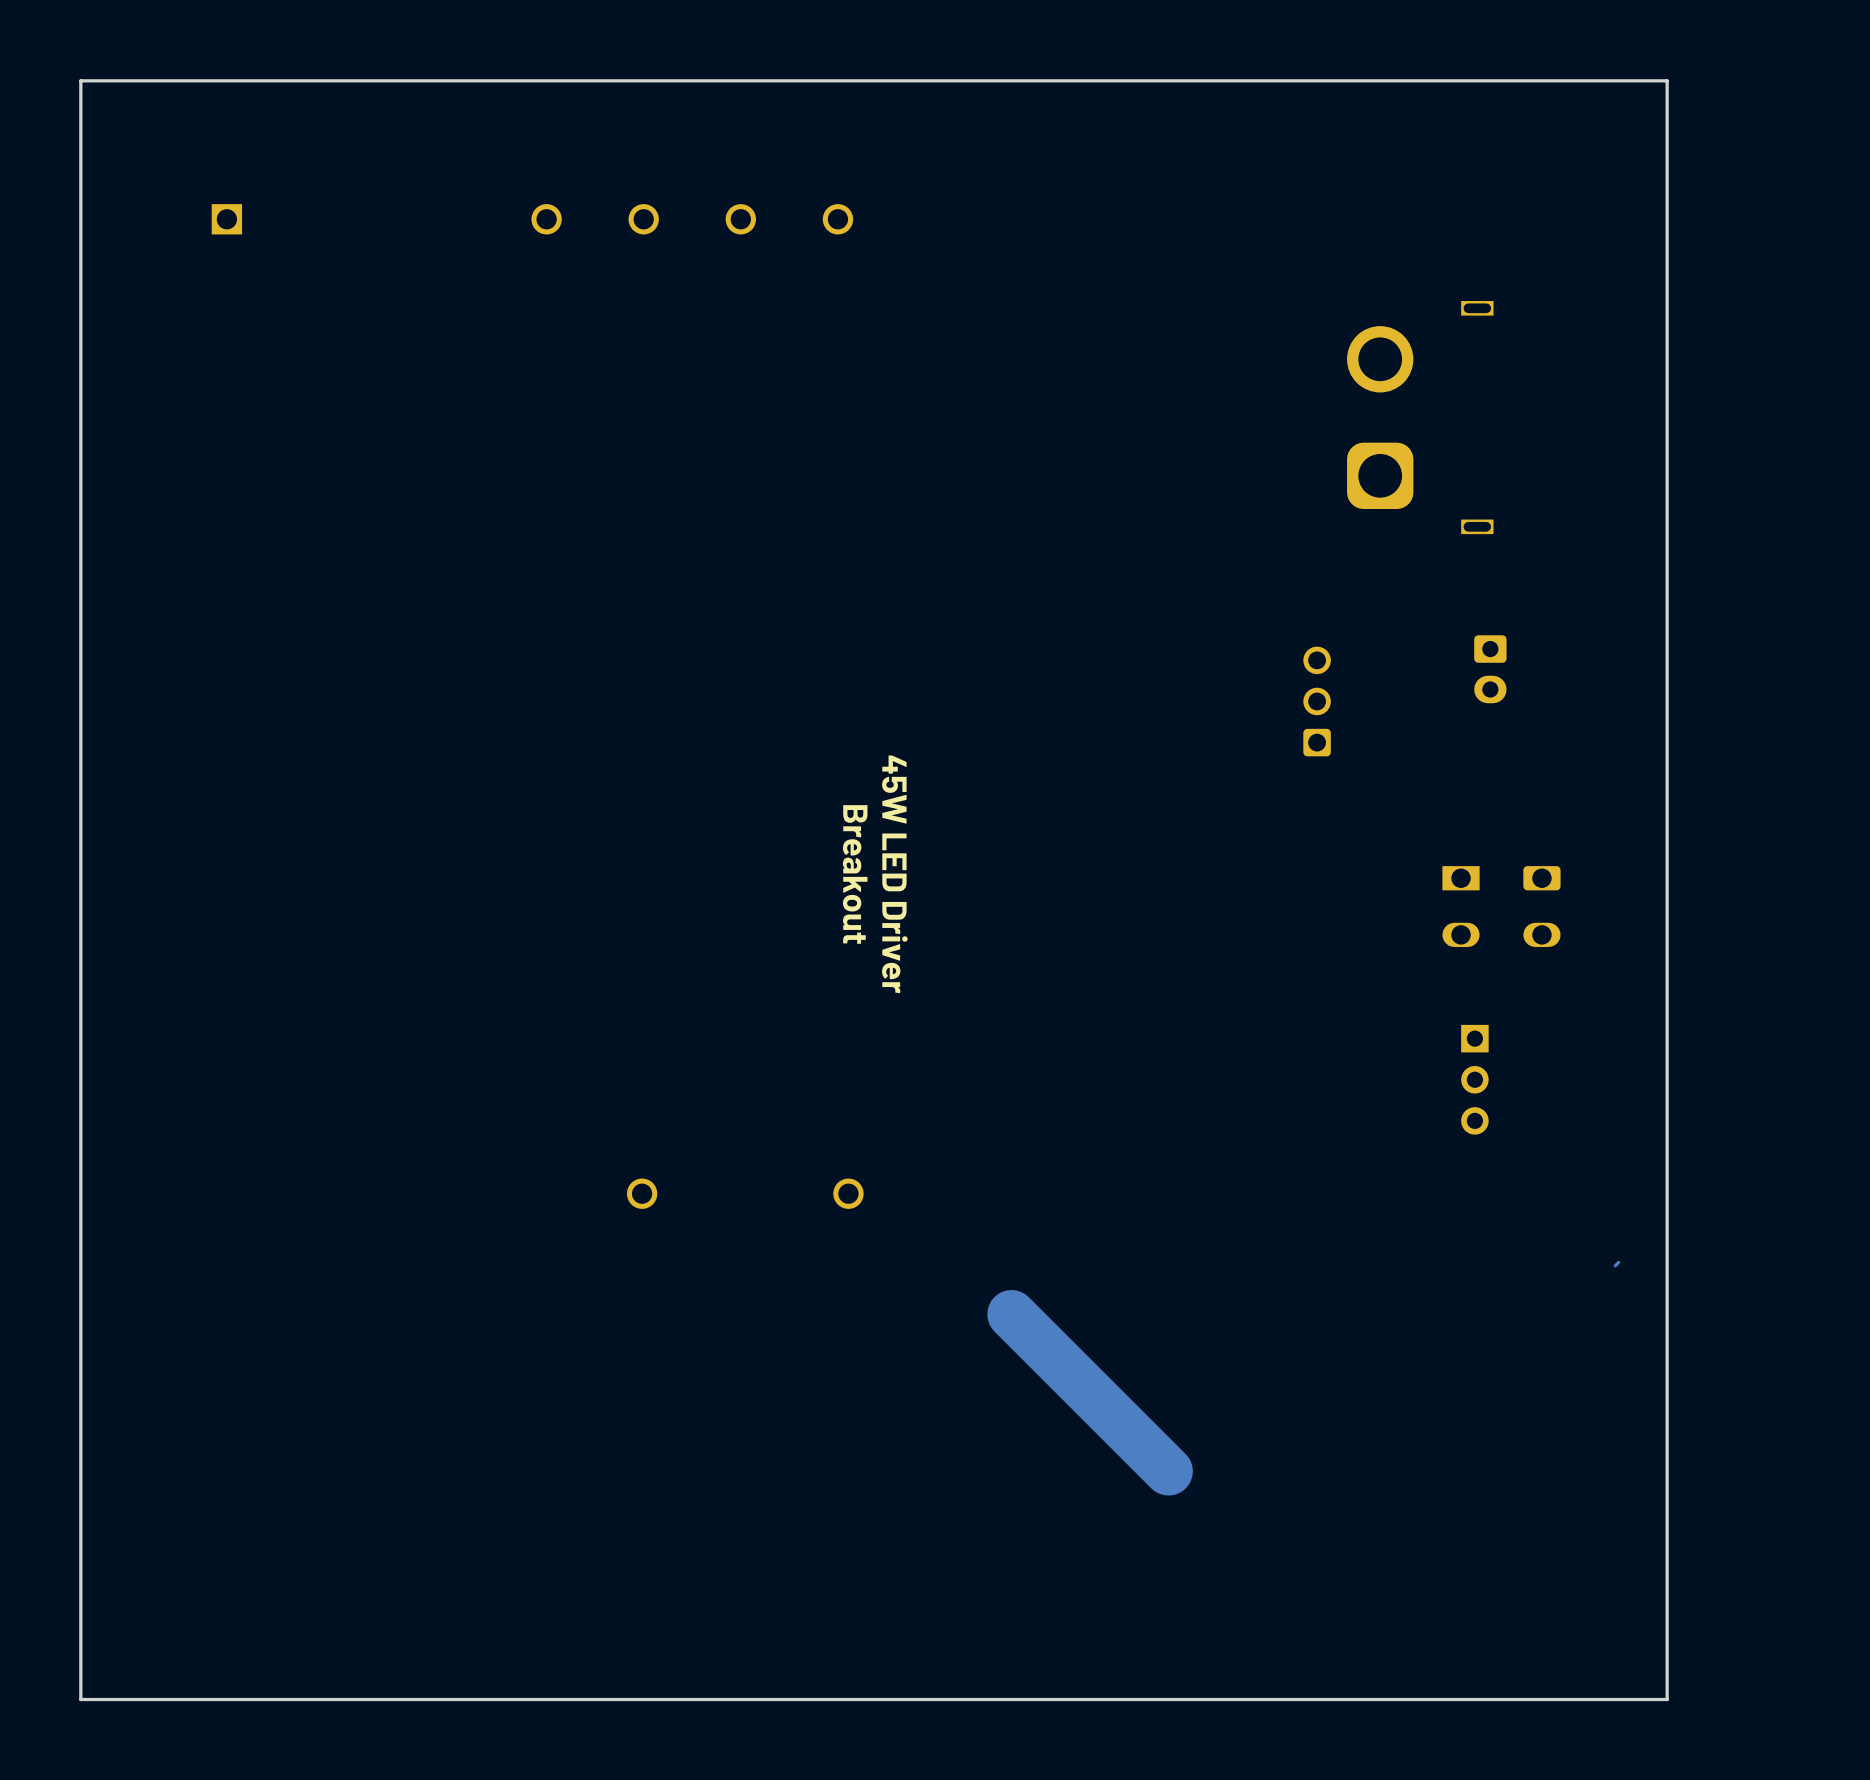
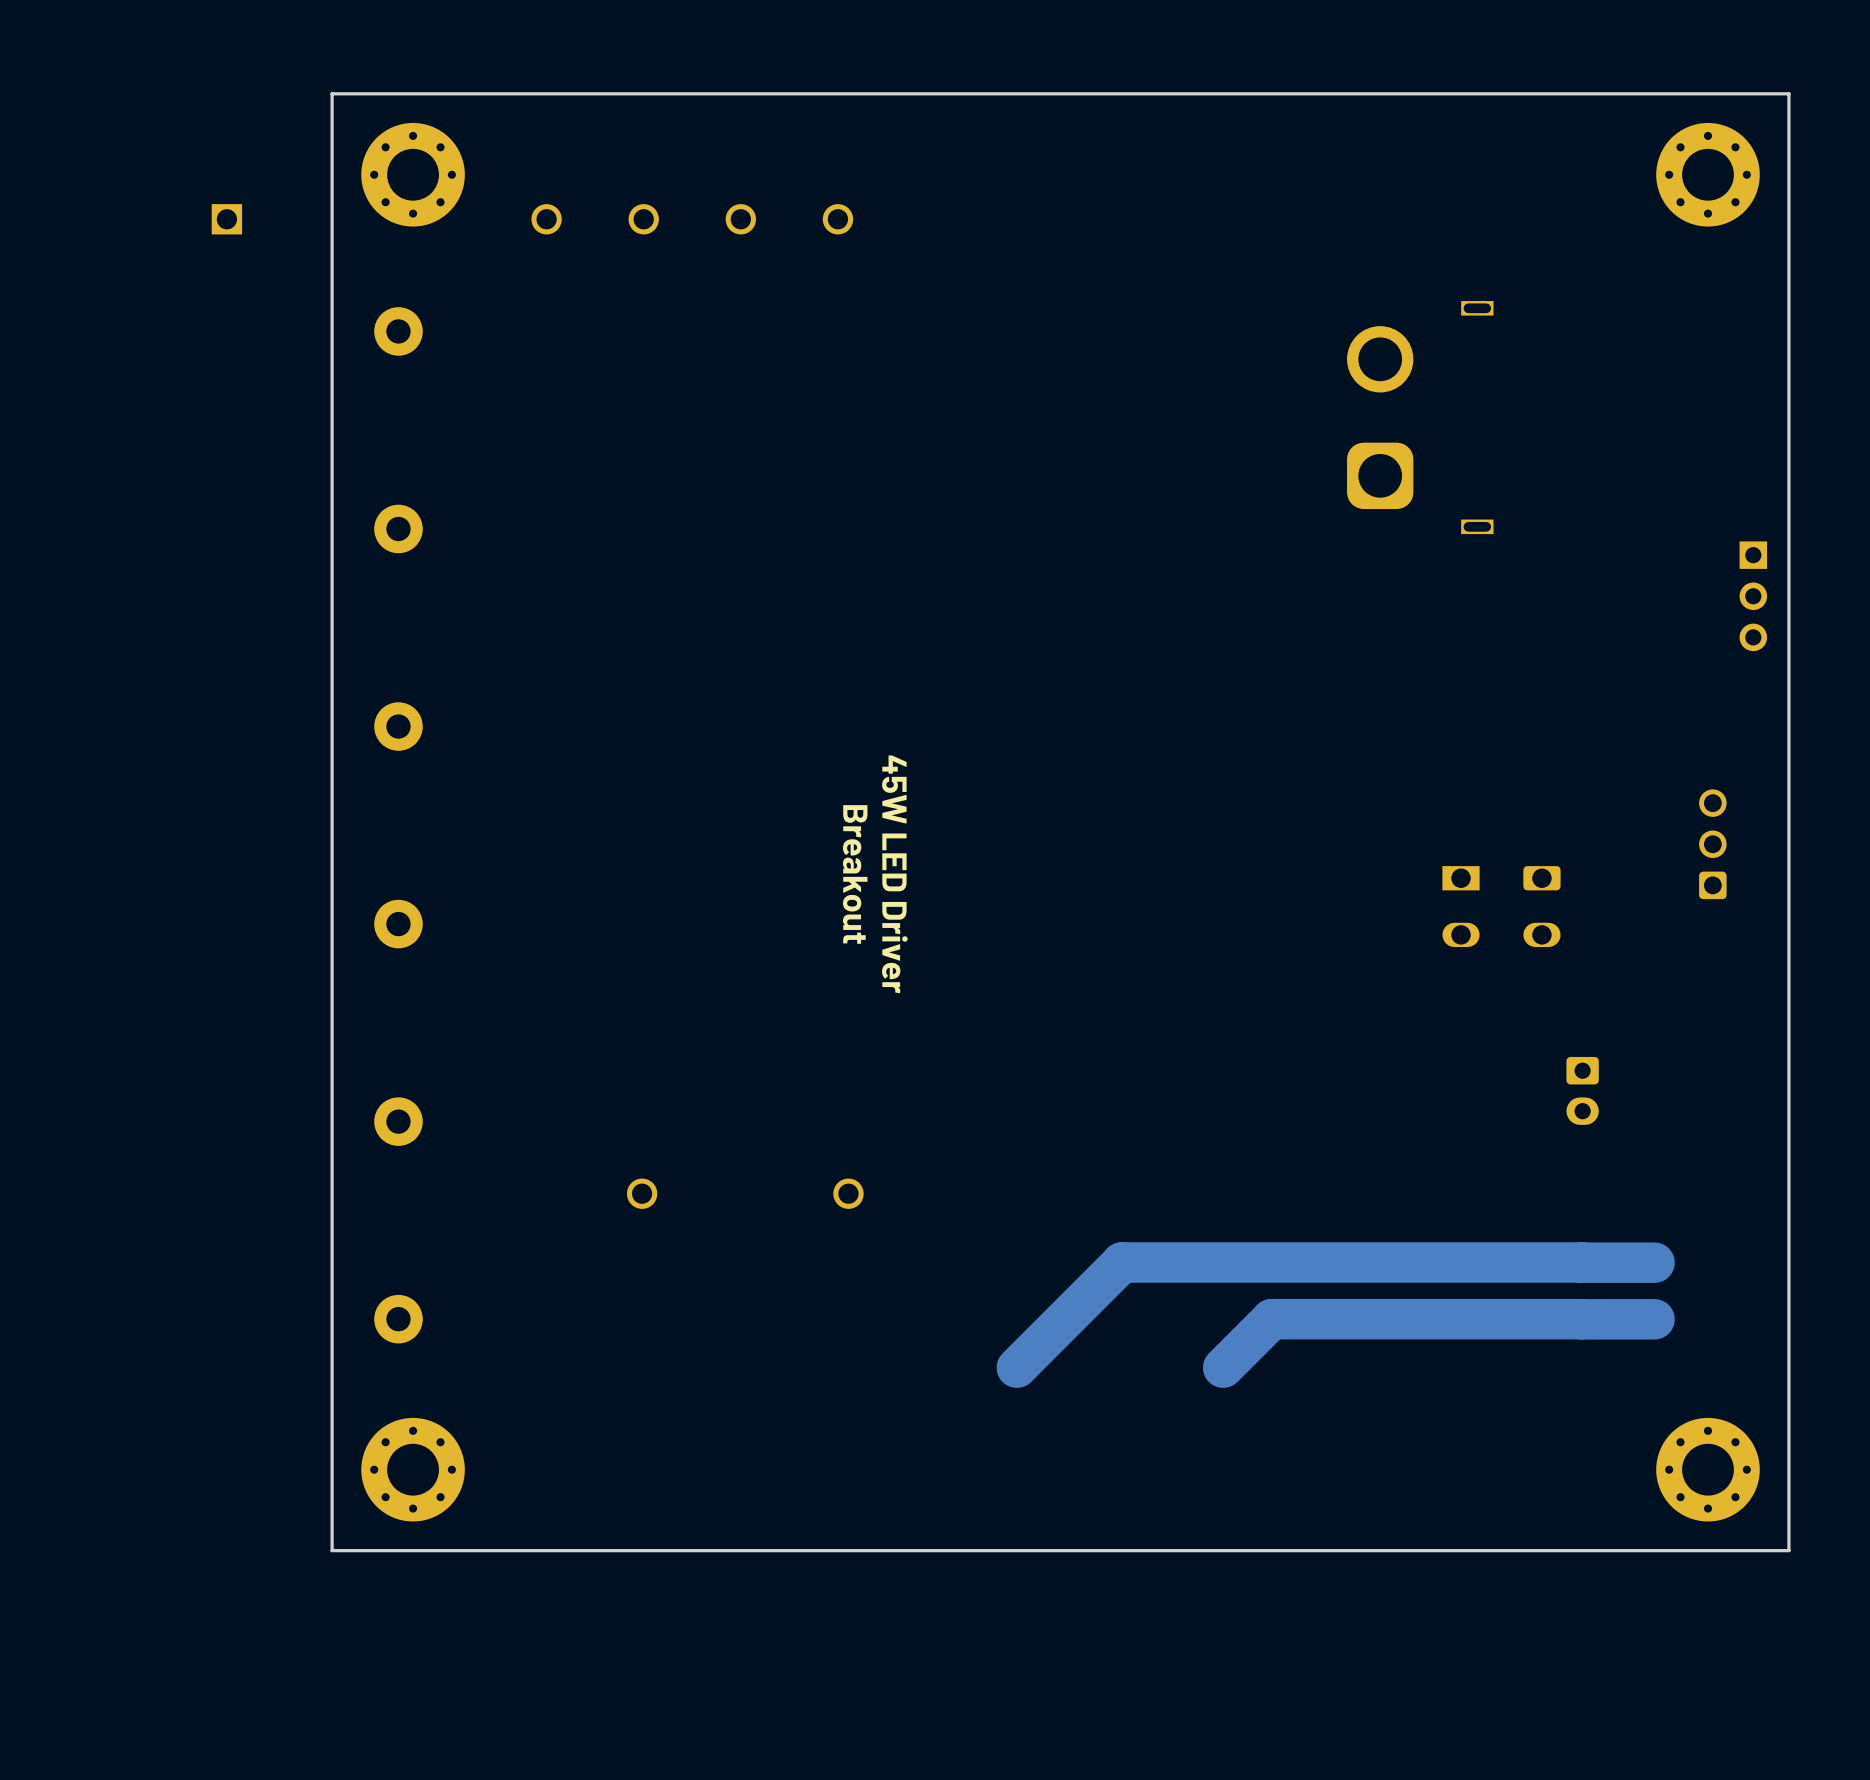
board edge: (1667, 80) (80, 80) (80, 1699) (1667, 1699) (1667, 80) -> (1788, 93) (1788, 1550) (332, 1550) (332, 93) (1788, 93)
part: none -> (413, 174)
part: none -> (1707, 174)
part: none -> (398, 331)
part: none -> (398, 528)
part: none -> (1753, 596)
part: (1490, 669) -> none
part: (1317, 701) -> none
part: none -> (398, 726)
part: none -> (1712, 844)
part: none -> (398, 924)
part: (1474, 1079) -> none
part: none -> (1582, 1090)
part: none -> (398, 1121)
track: none -> (1581, 1262) (1122, 1262) (1016, 1367)
track: none -> (1654, 1262) (1581, 1262)
track: (1011, 1314) (1168, 1471) -> none
part: none -> (398, 1319)
track: none -> (1581, 1319) (1271, 1319) (1223, 1367)
track: none -> (1654, 1319) (1581, 1319)
part: none -> (413, 1469)
part: none -> (1707, 1469)

